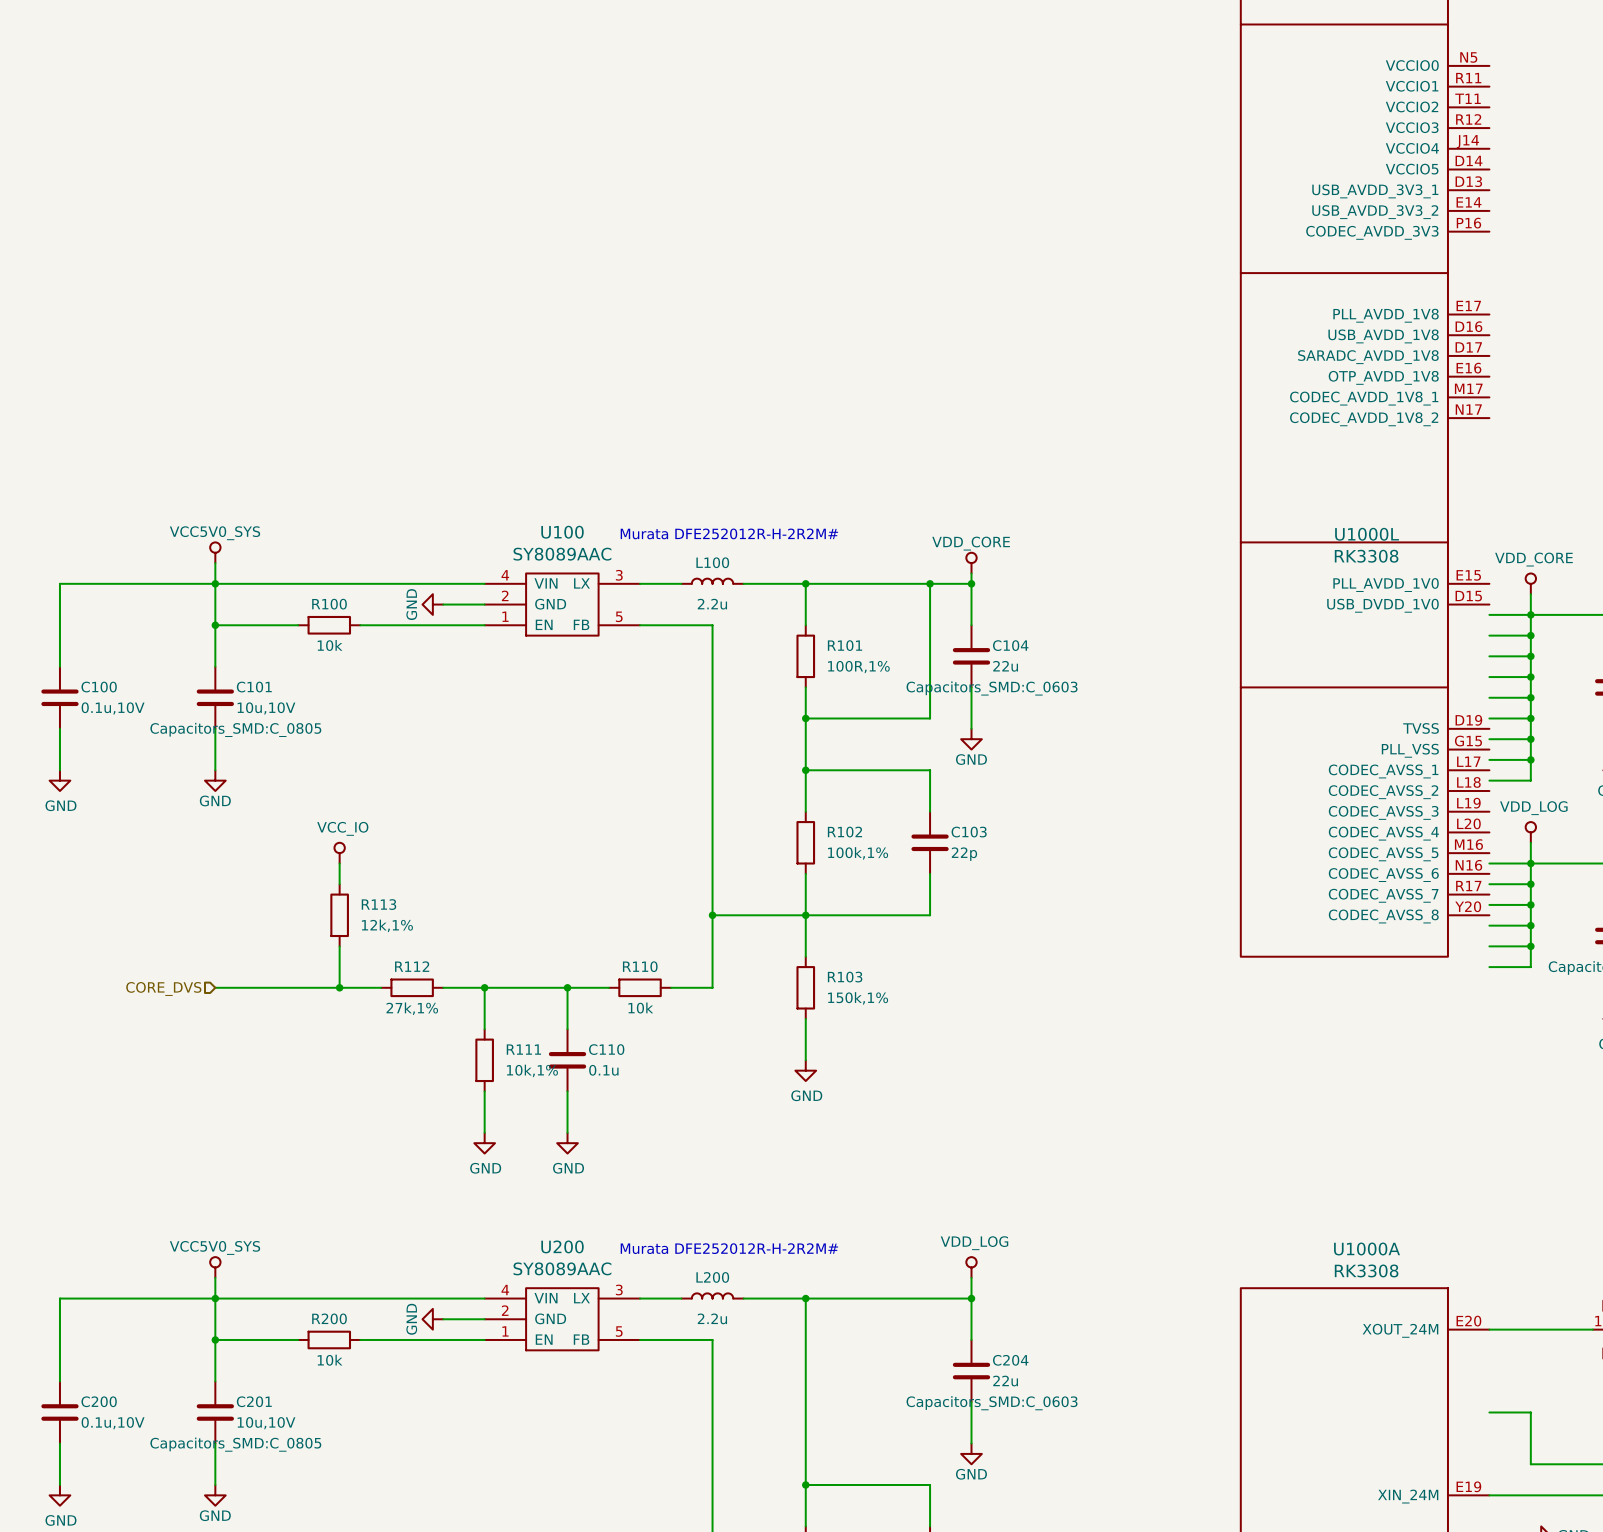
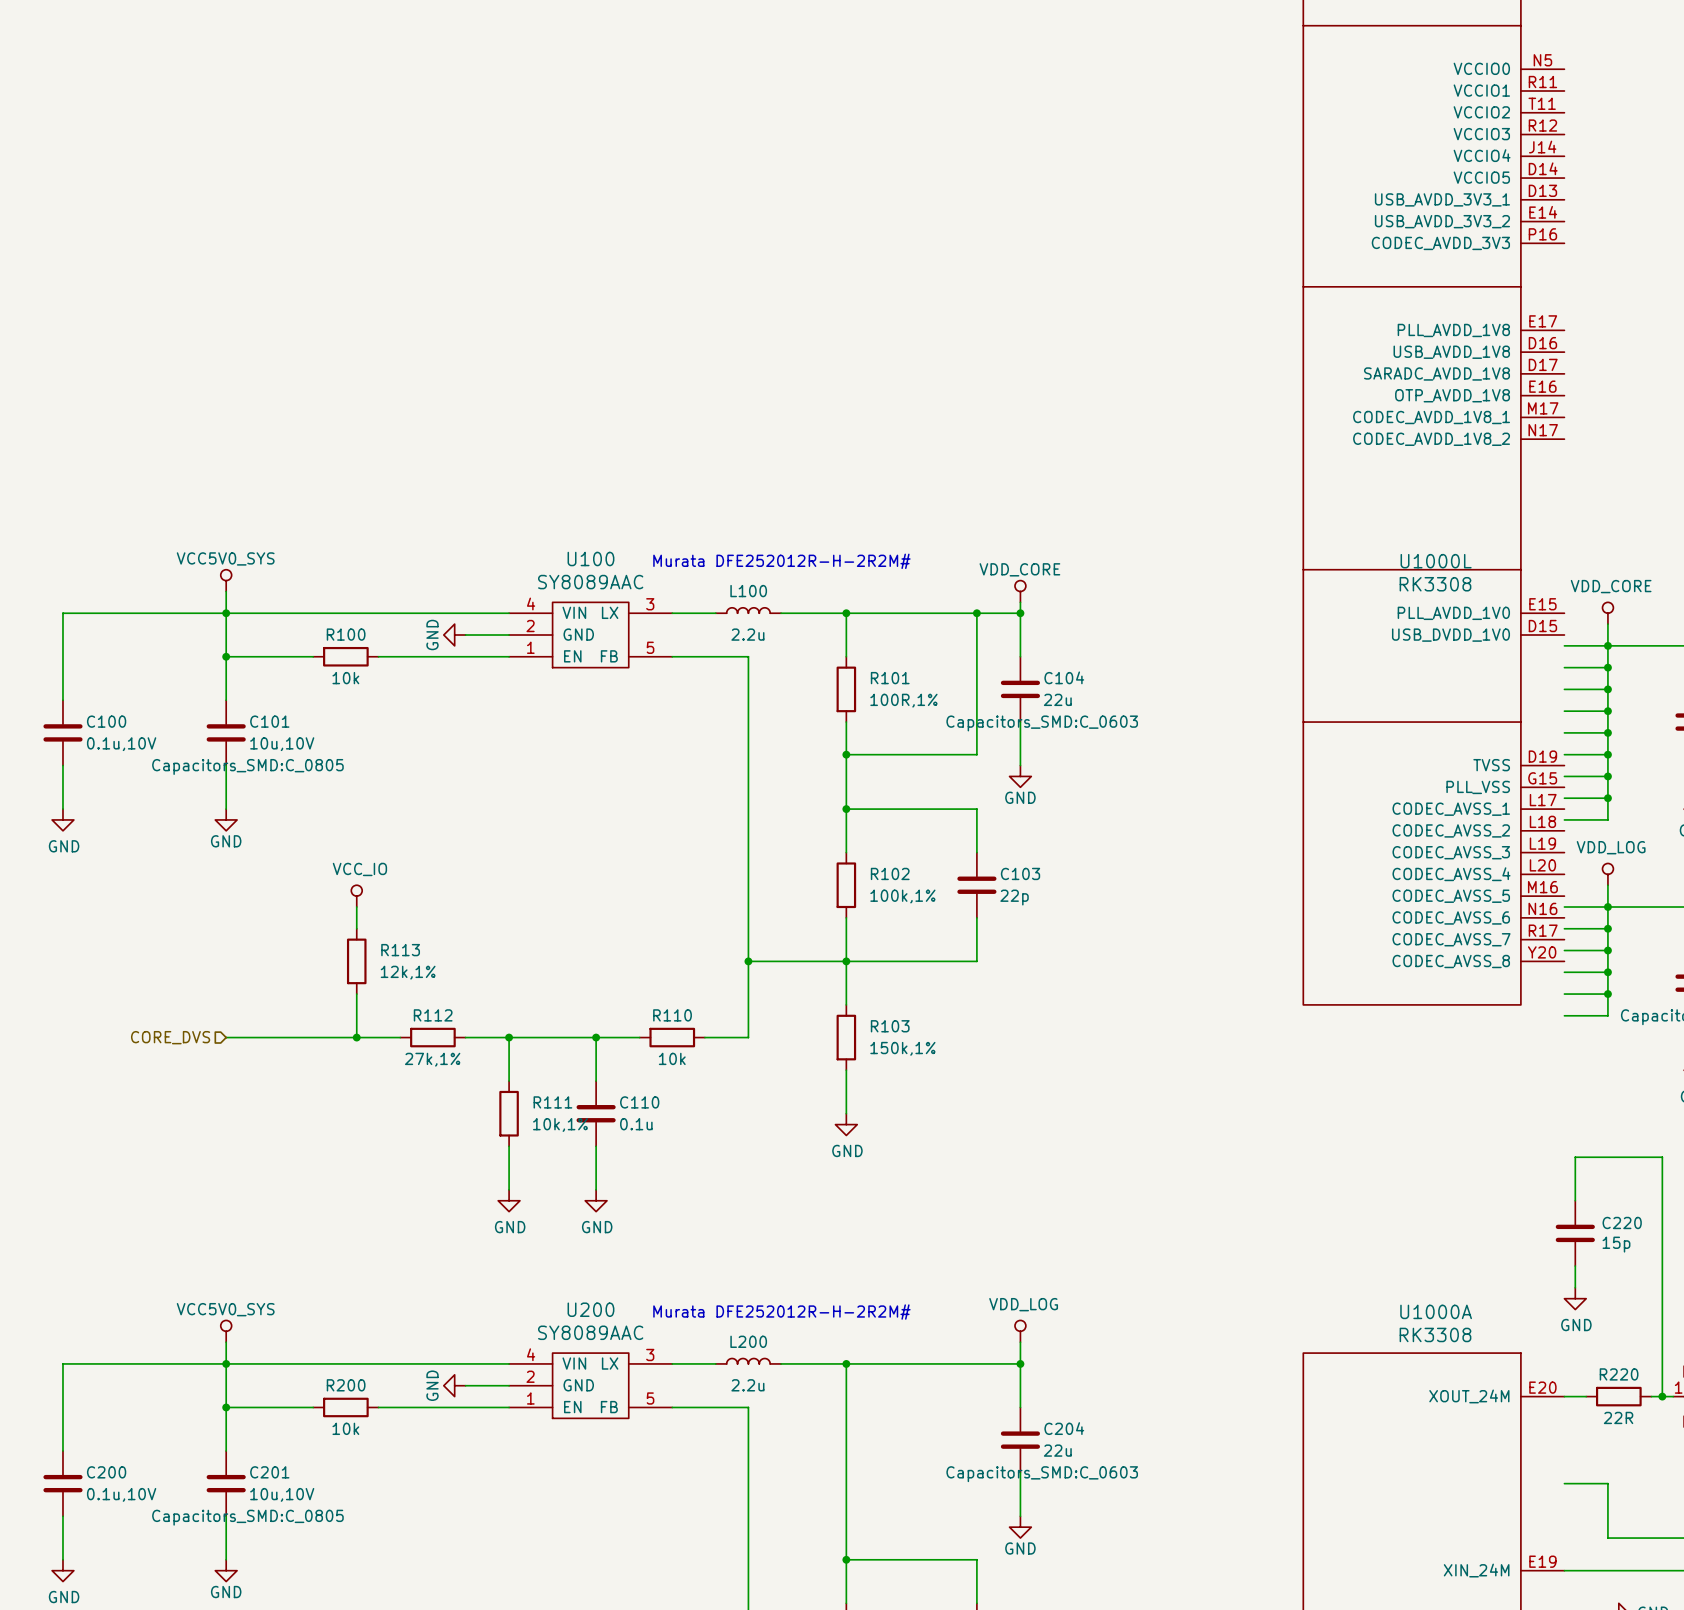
wire: none -> (1575, 1200) (1575, 1157) (1662, 1157) (1662, 1396)
C220: none -> 15p (1575, 1233)
wire: none -> (1575, 1266) (1575, 1287)
power symbol: none -> GND (1575, 1298)
wire: (1510, 1329) (1572, 1329) -> none
R220: none -> 22R (1618, 1396)
junction: none -> (1662, 1396)

